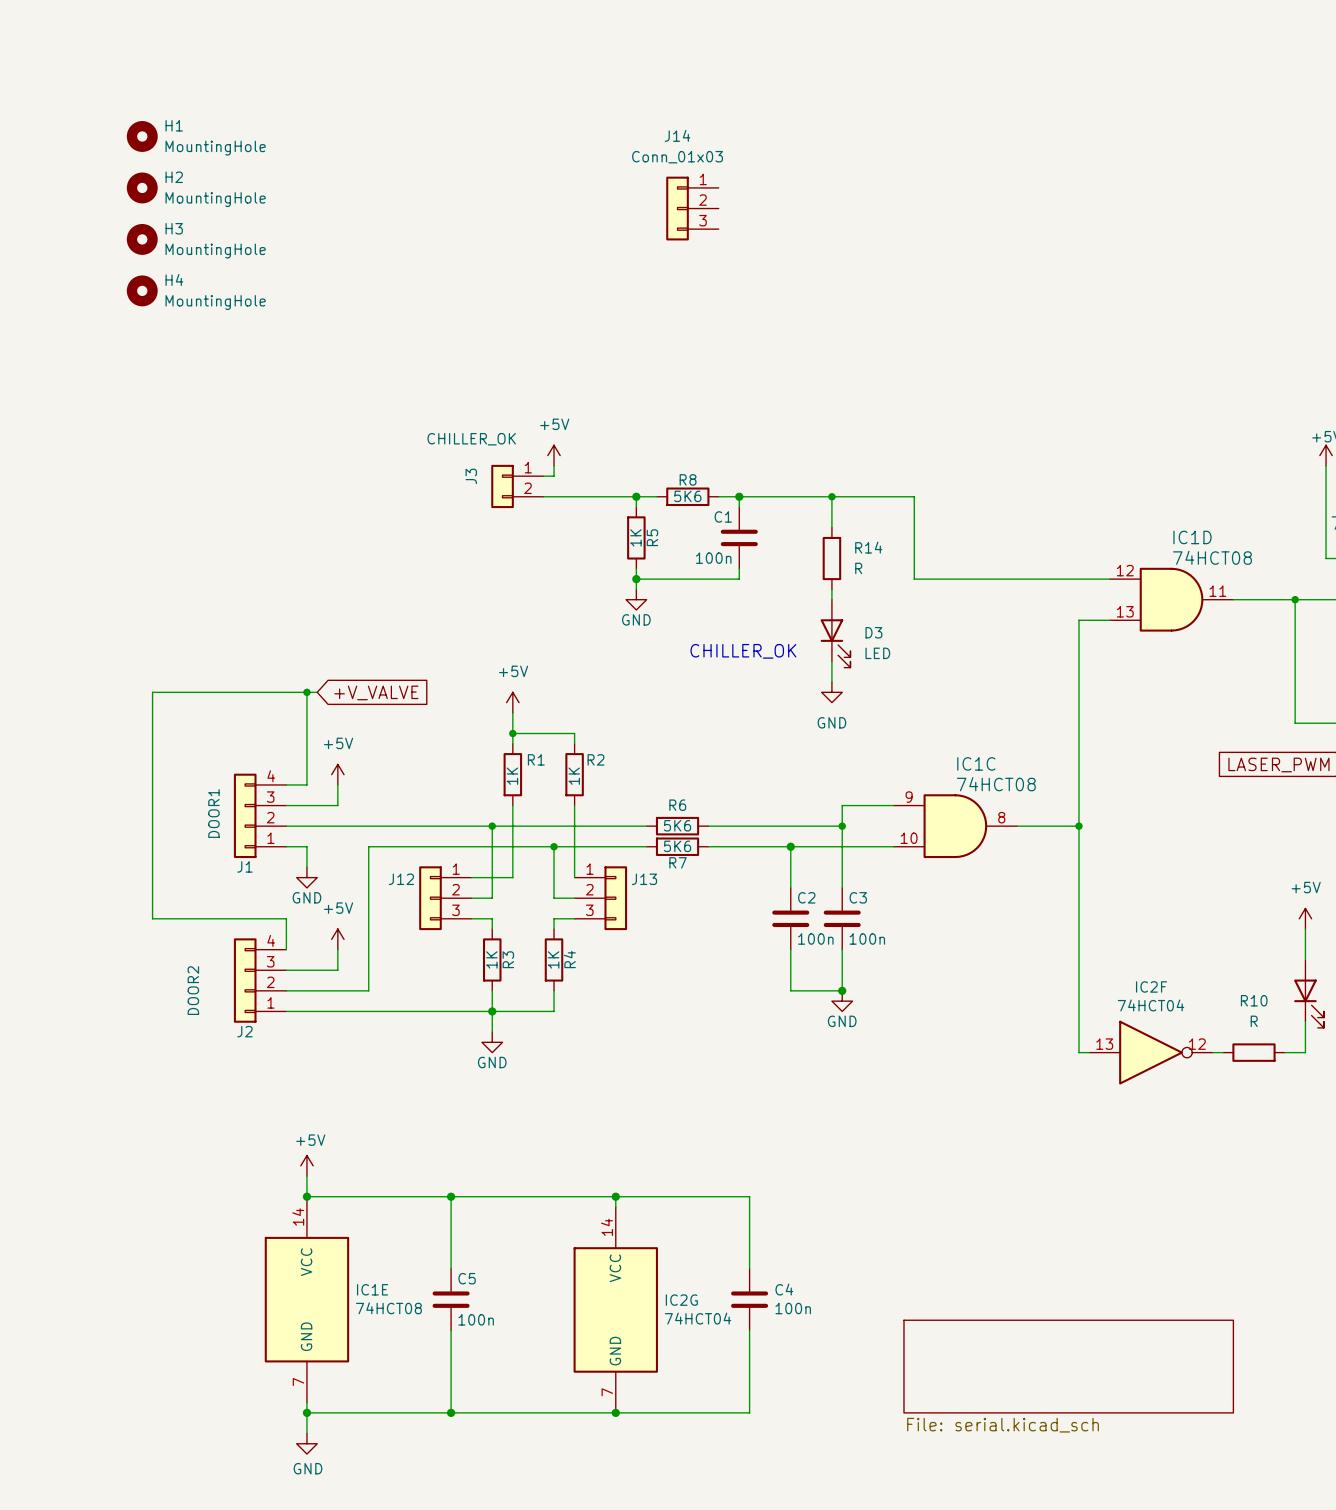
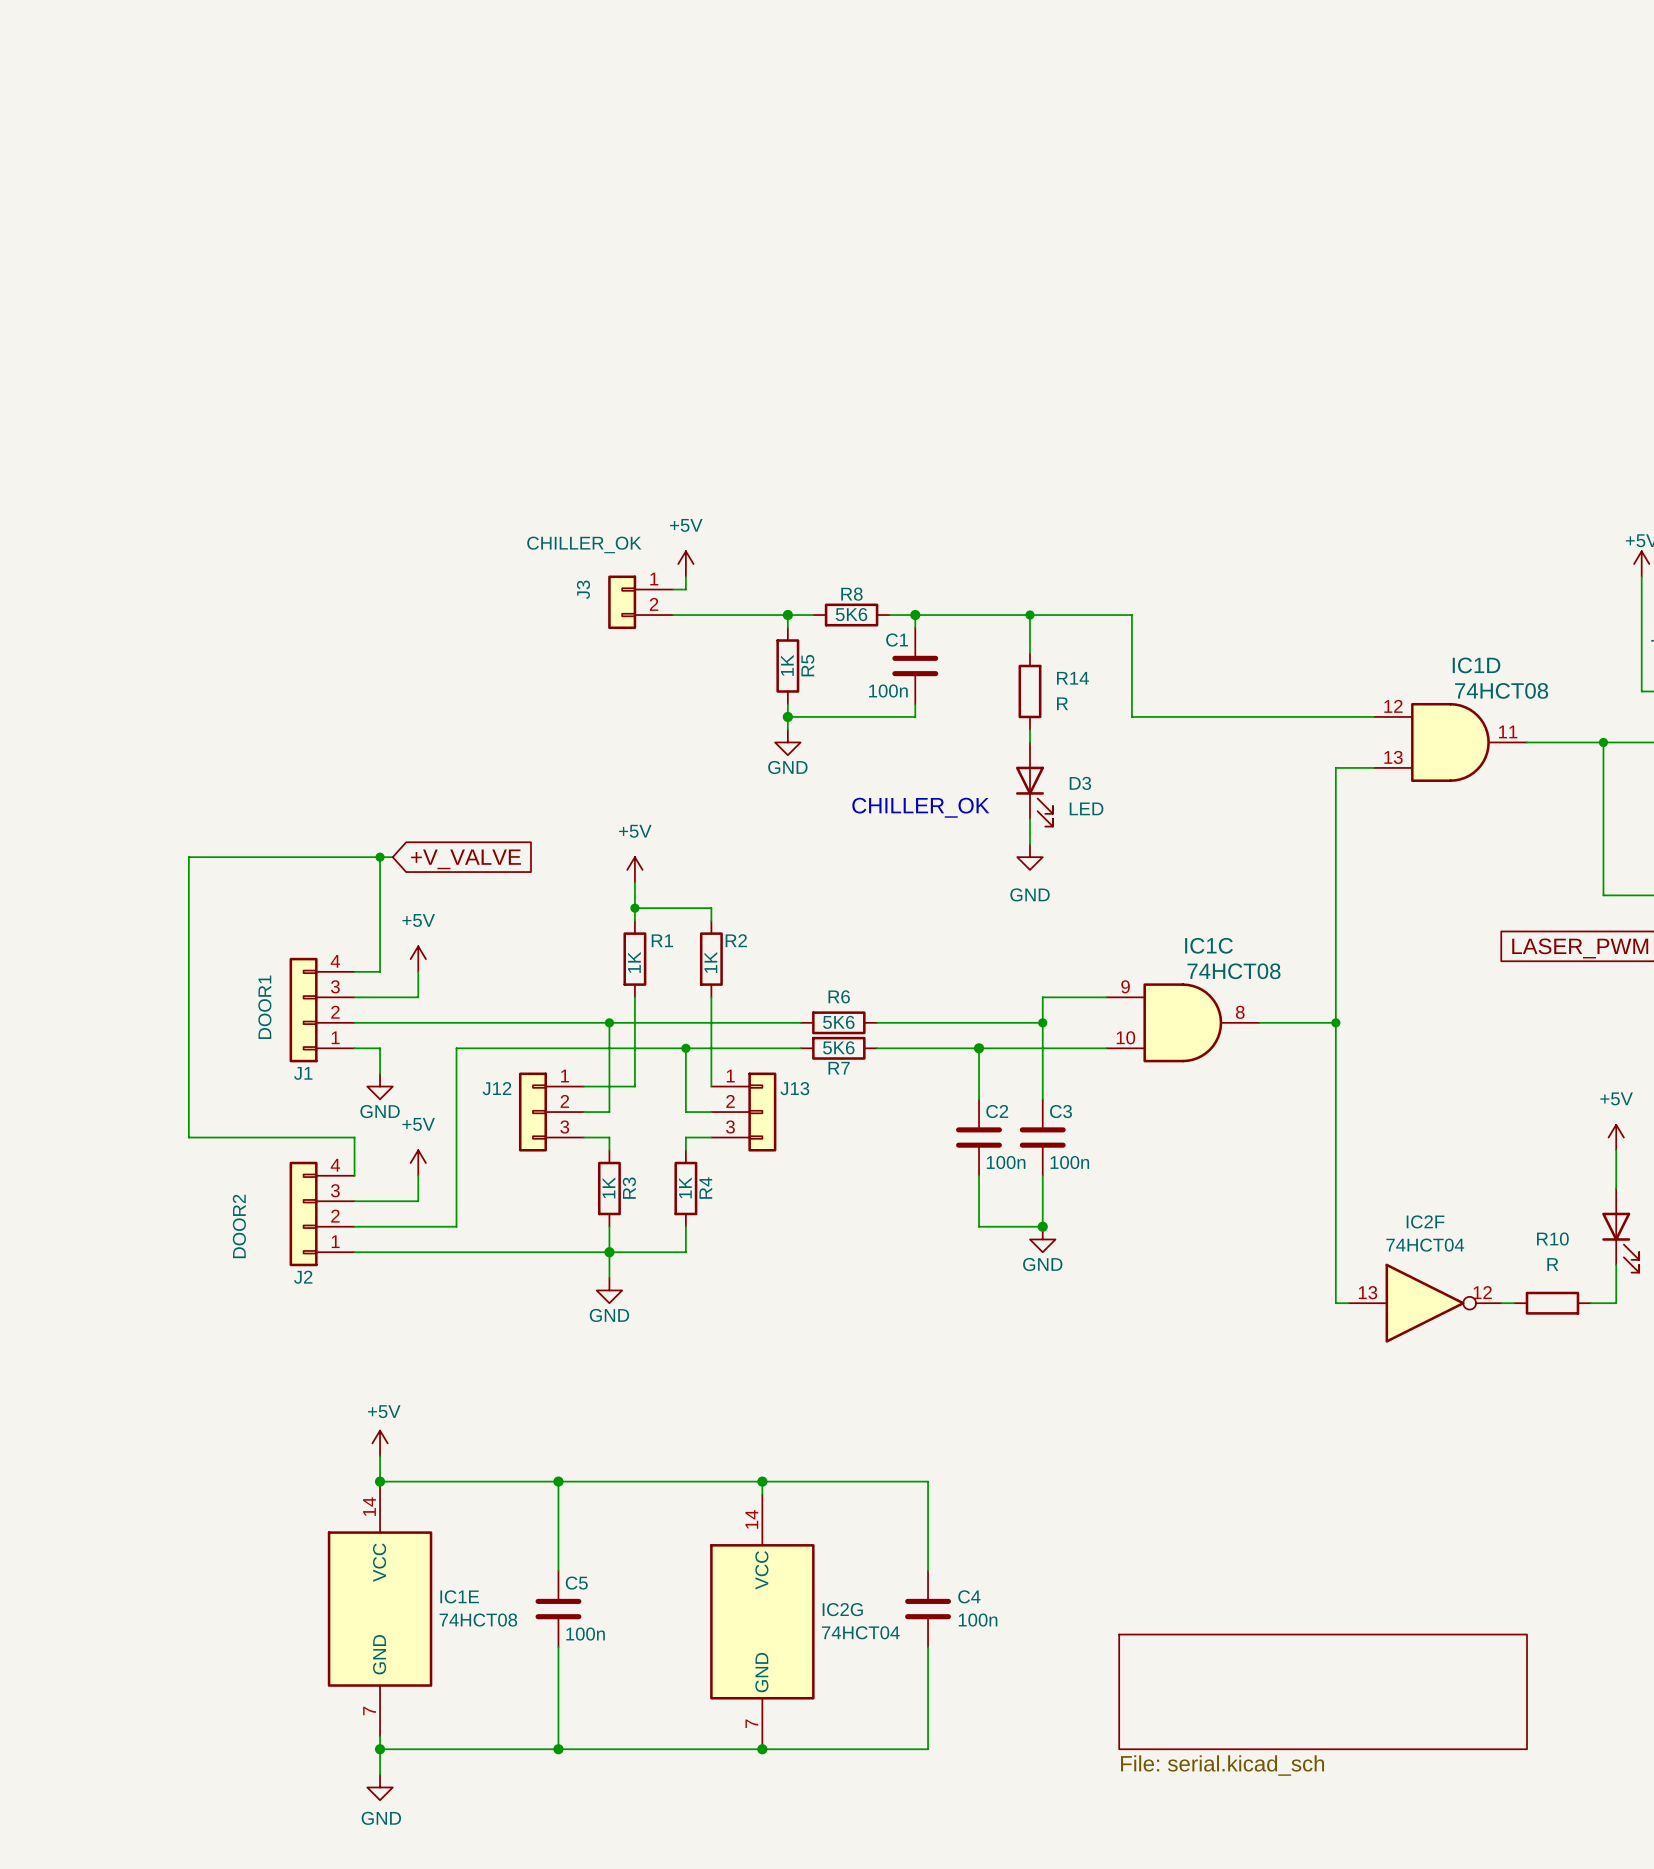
H1: MountingHole (142, 136) -> none
H2: MountingHole (142, 187) -> none
J14: Conn_01x03 (692, 208) -> none
H3: MountingHole (142, 239) -> none
H4: MountingHole (142, 290) -> none

